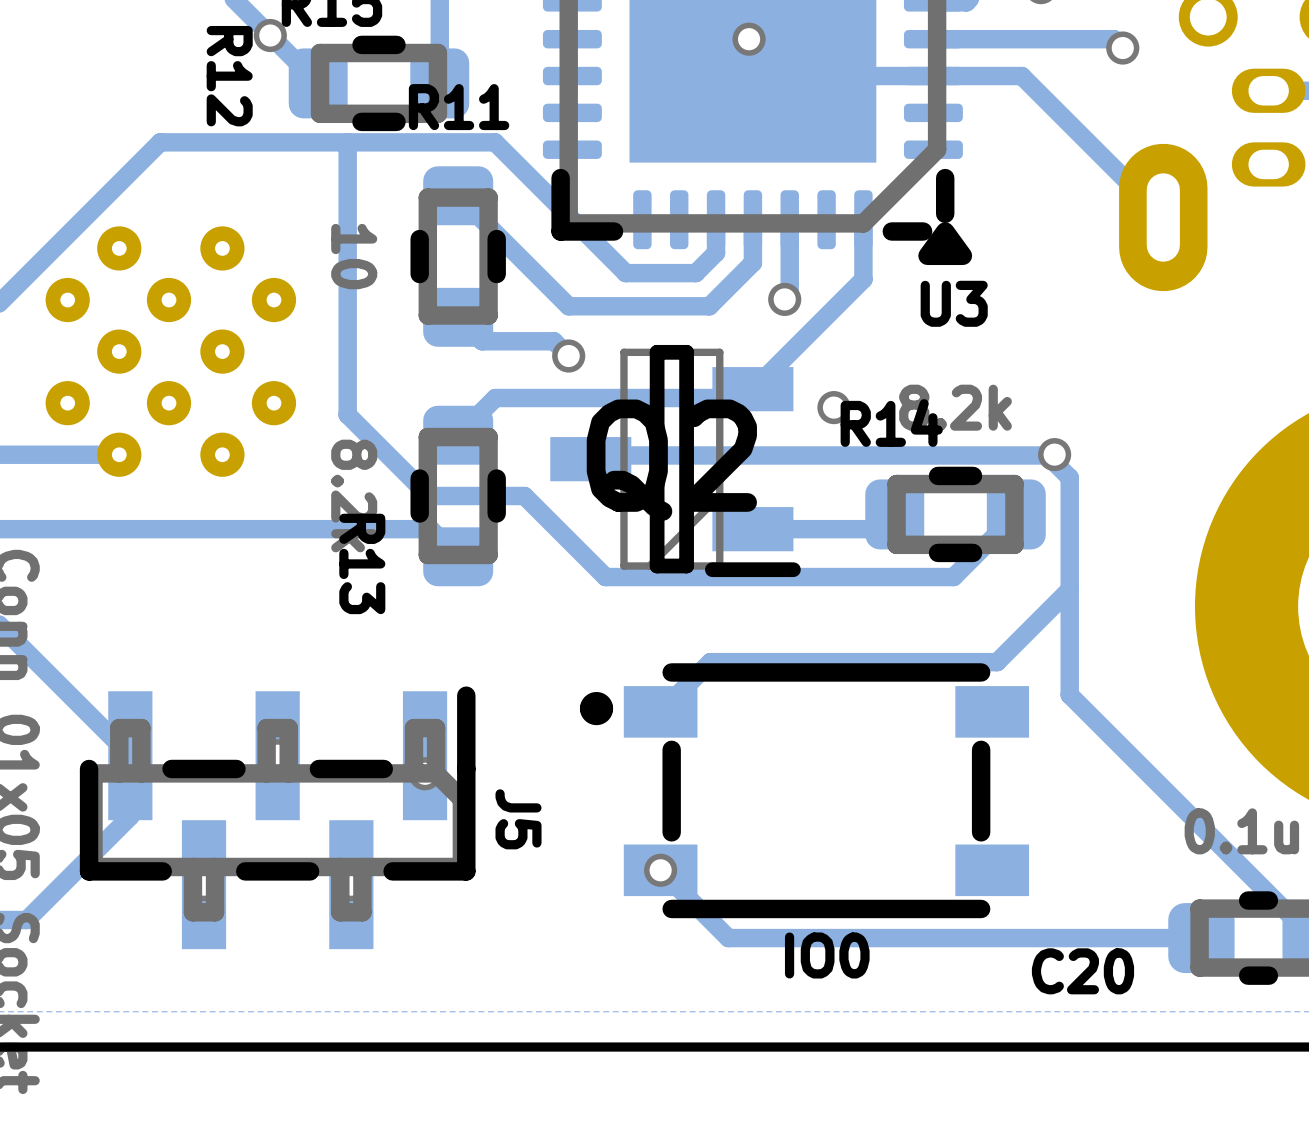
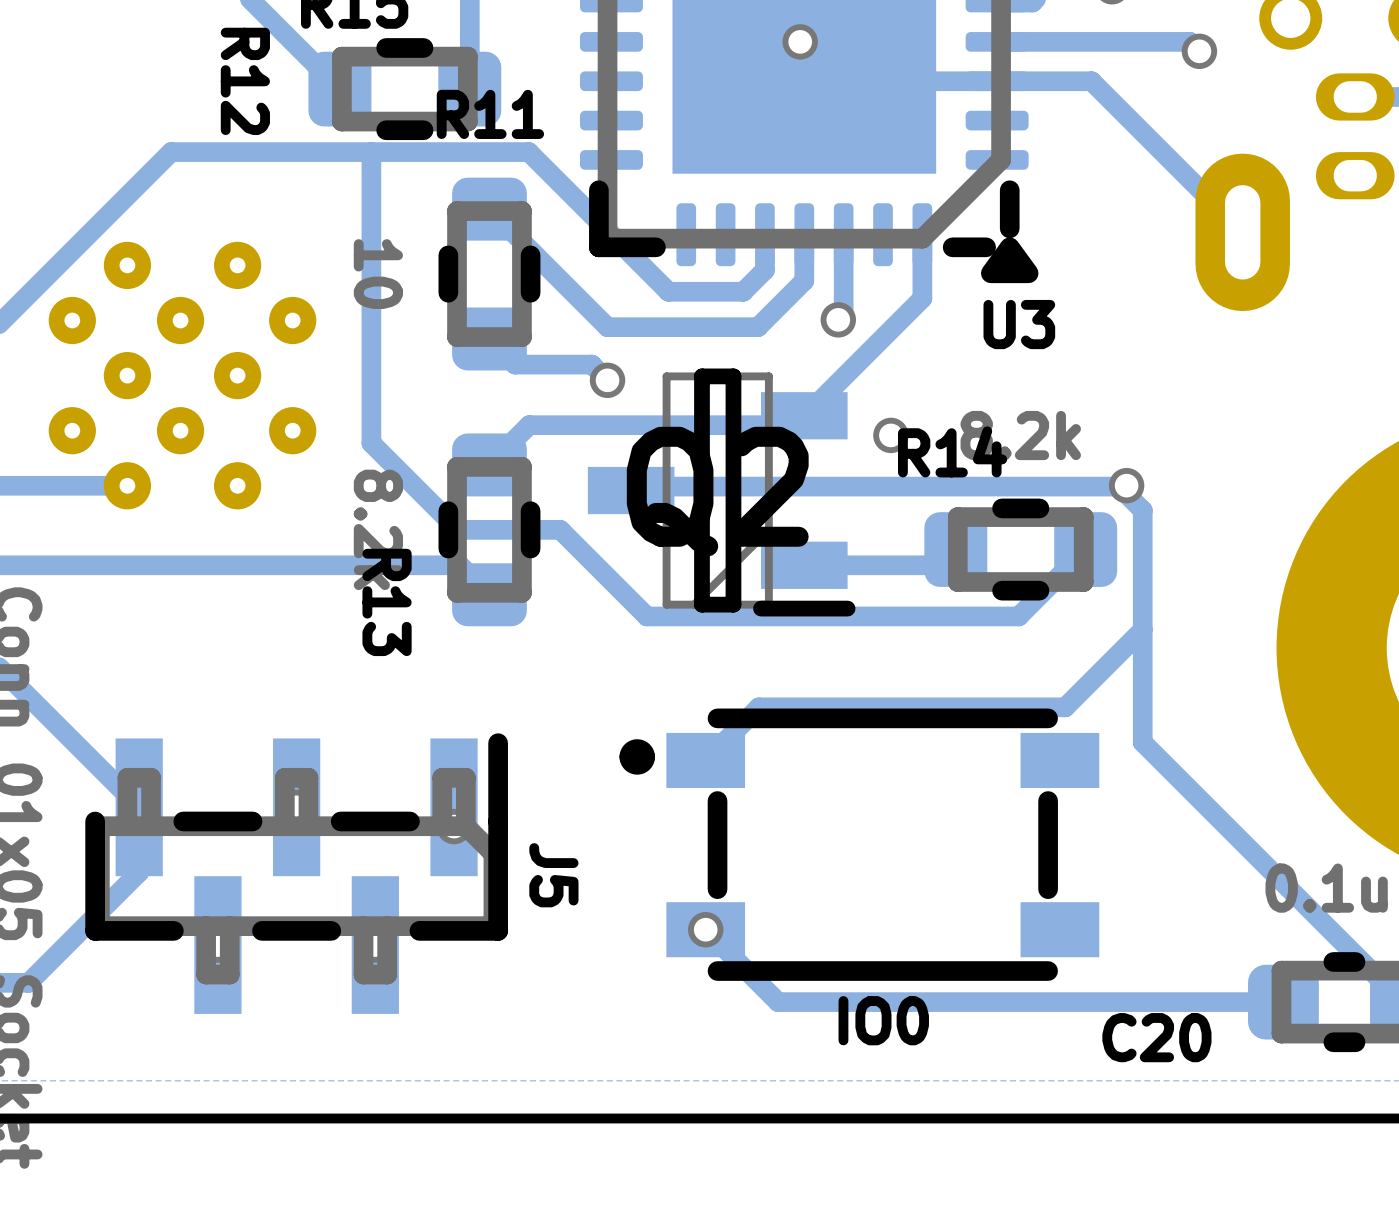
via: (270, 35) -> none

